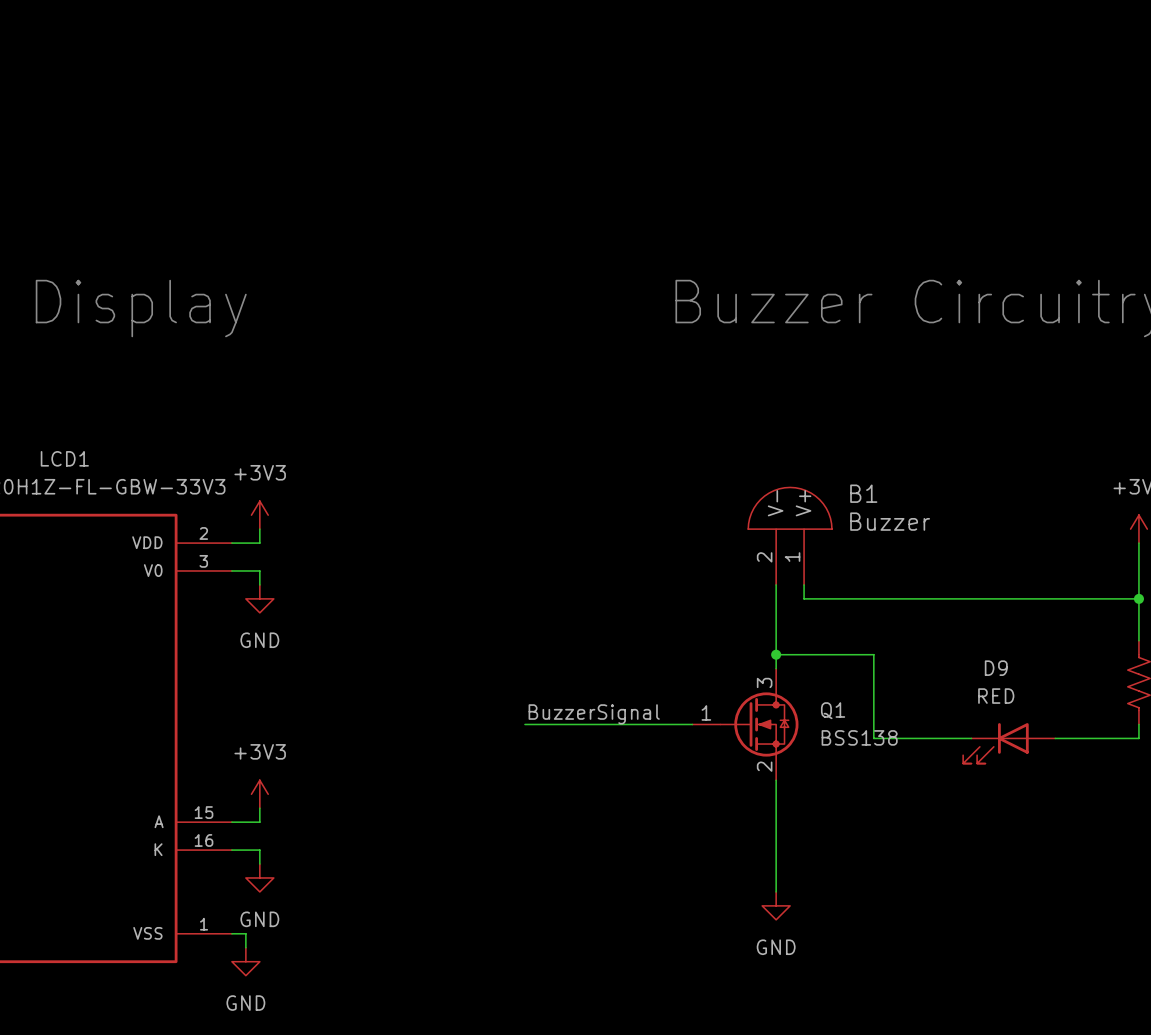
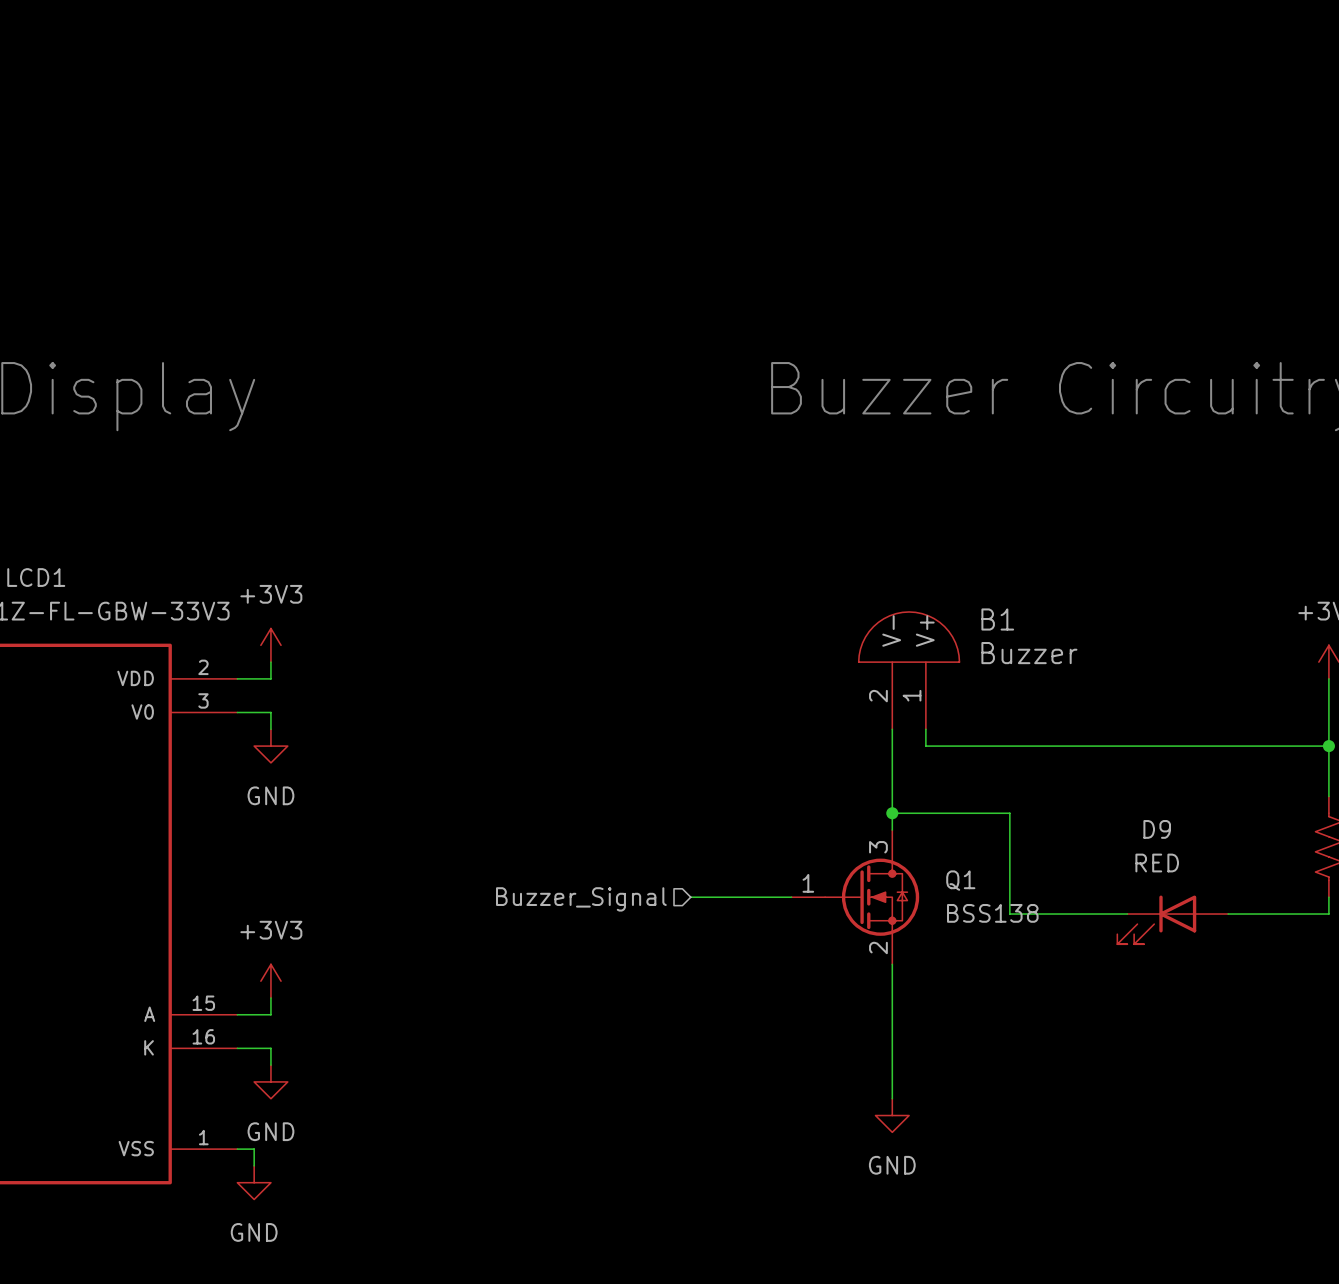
label: BuzzerSignal (594, 714) -> none
wire: (524, 724) (608, 724) -> none
hierarchical label: none -> Buzzer_Signal (581, 899)

